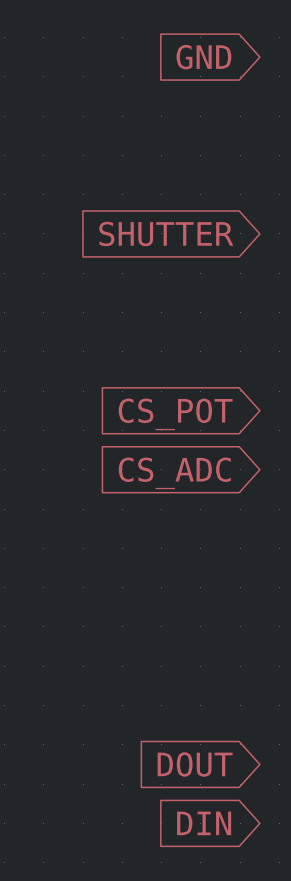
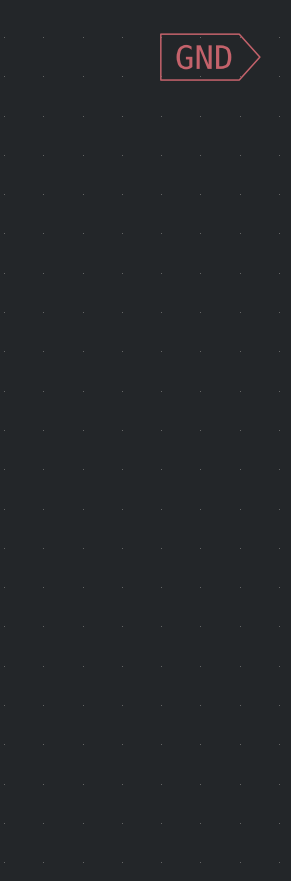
global label: SHUTTER (166, 233) -> none
global label: CS_POT (175, 414) -> none
global label: CS_ADC (174, 473) -> none
global label: DOUT (195, 764) -> none
global label: DIN (204, 823) -> none

